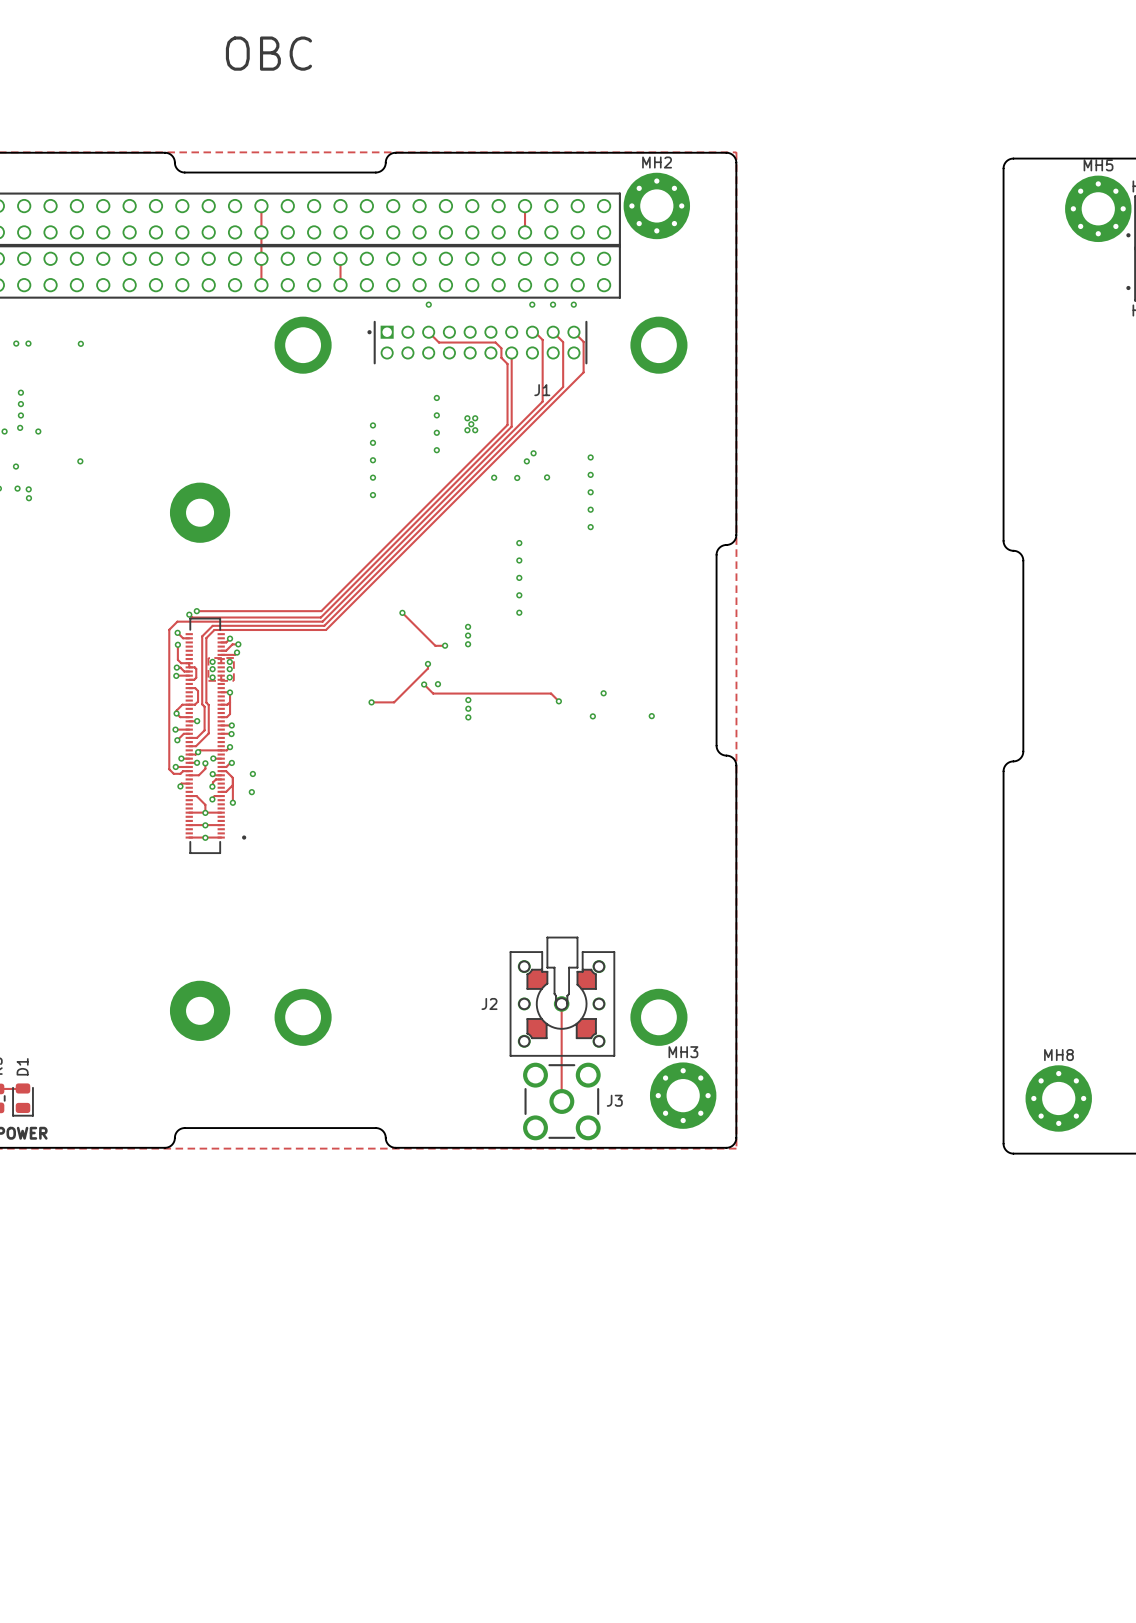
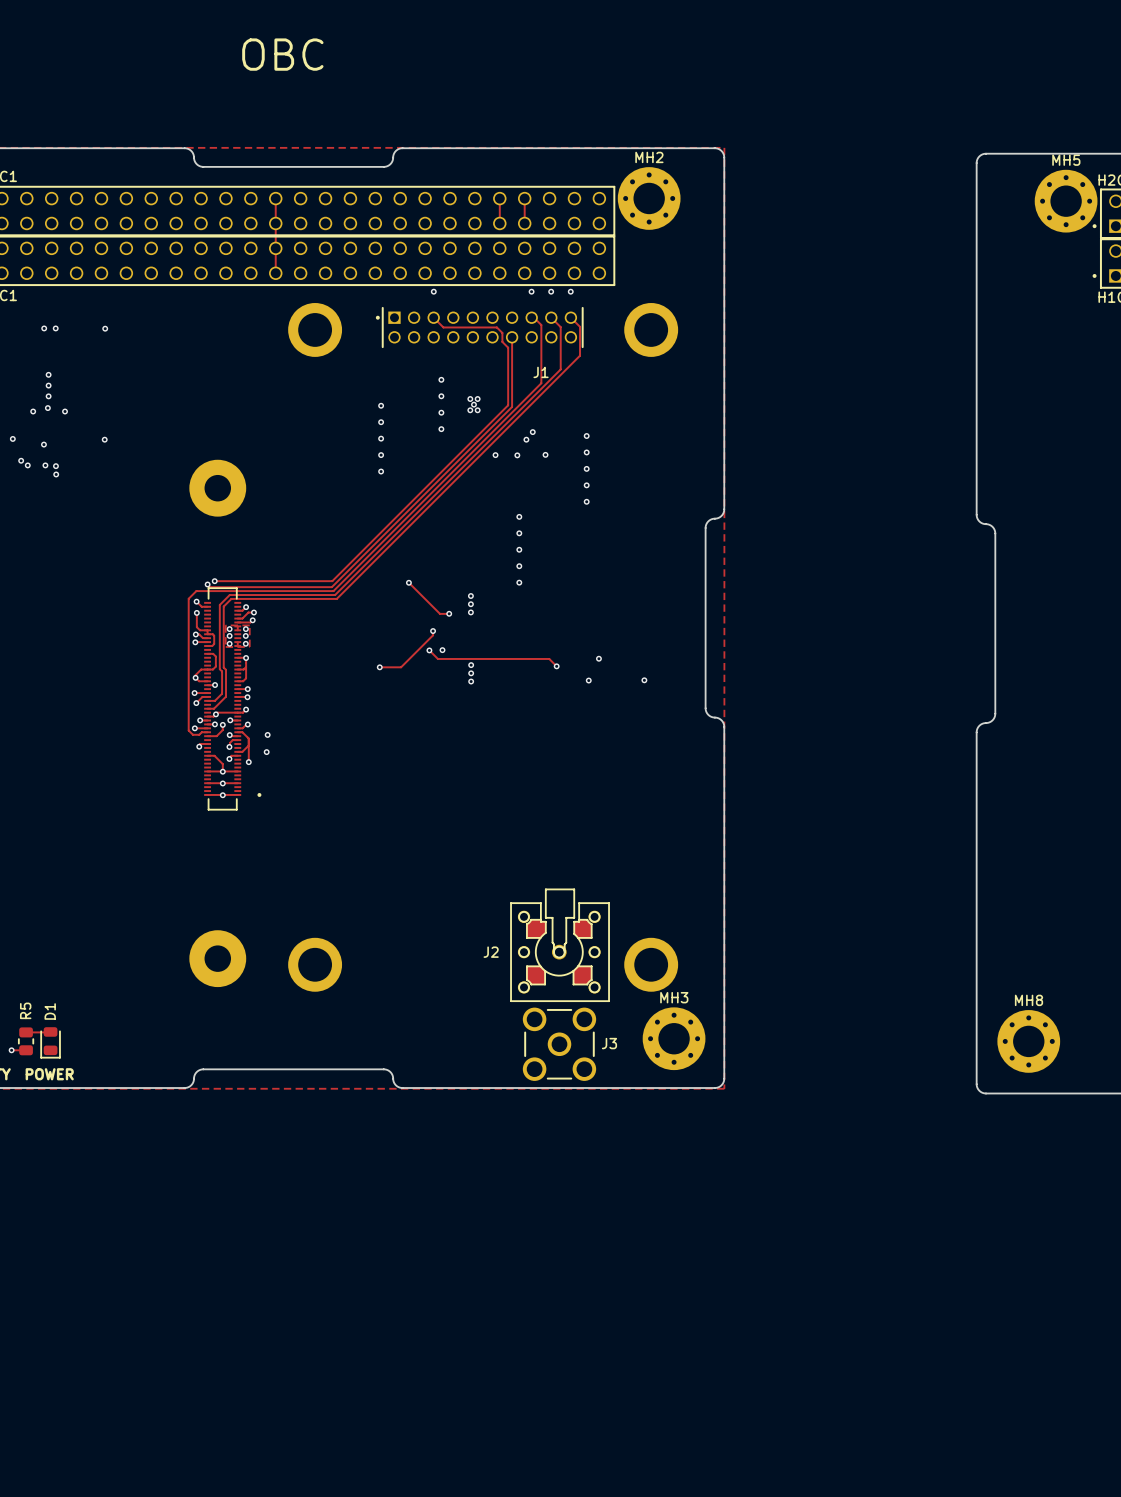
track: (340, 258) (340, 285) -> (499, 198) (499, 223)
track: (561, 1003) (561, 1101) -> none

